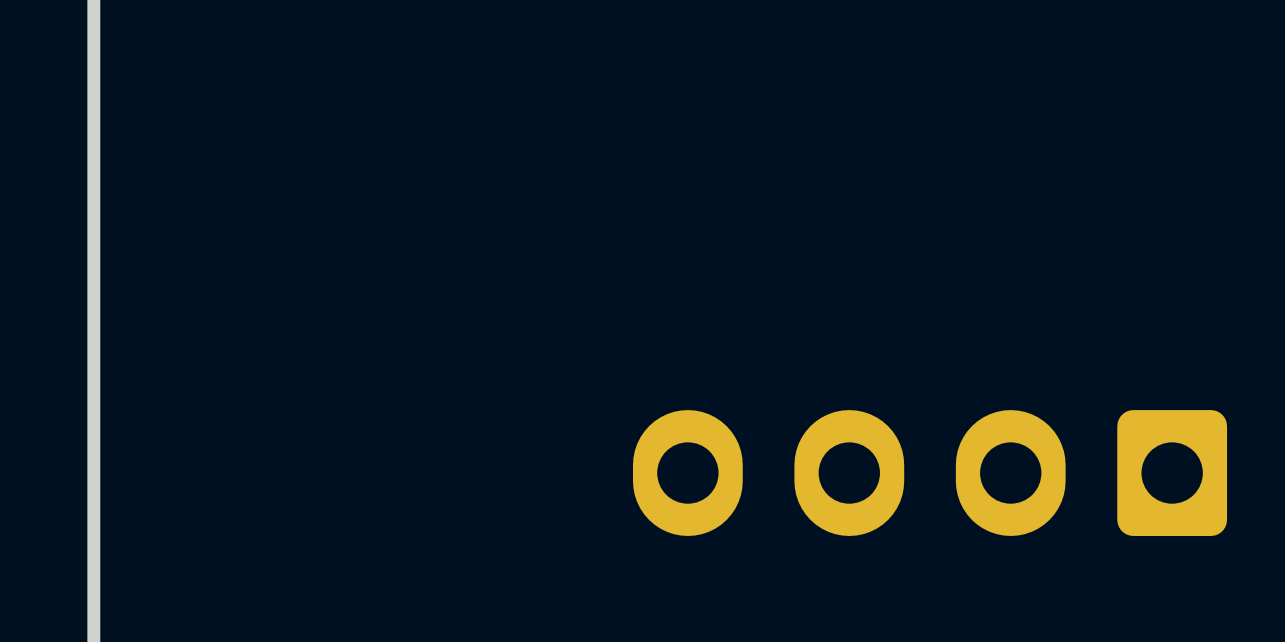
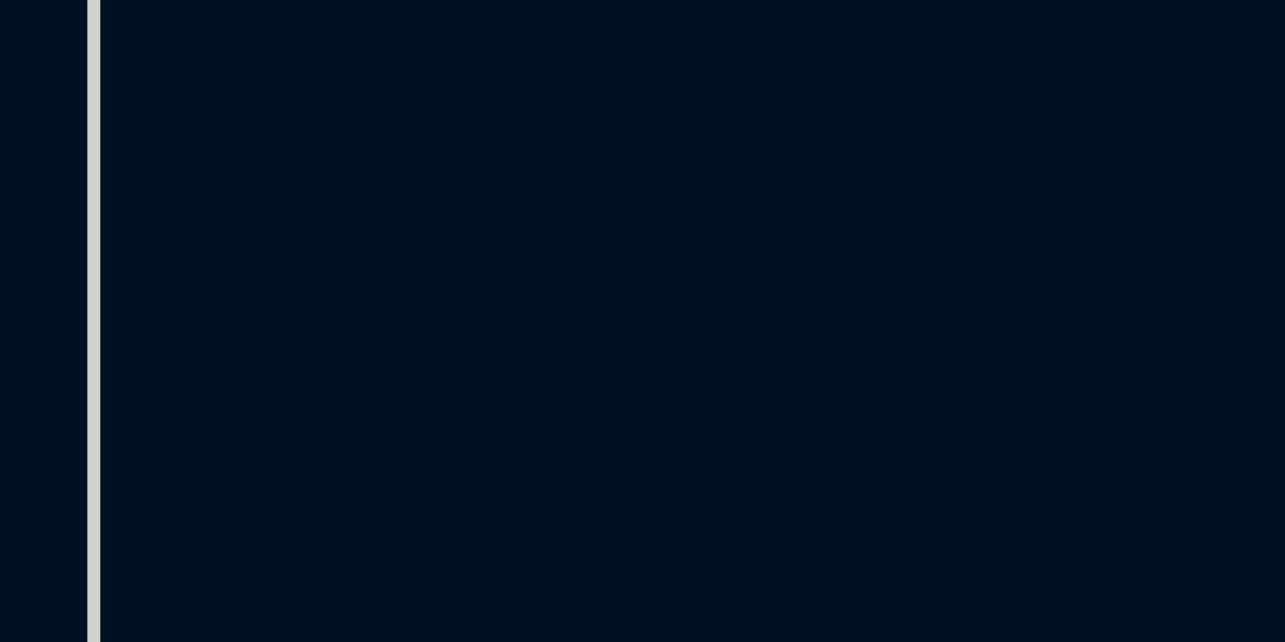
part: (930, 473) -> none

